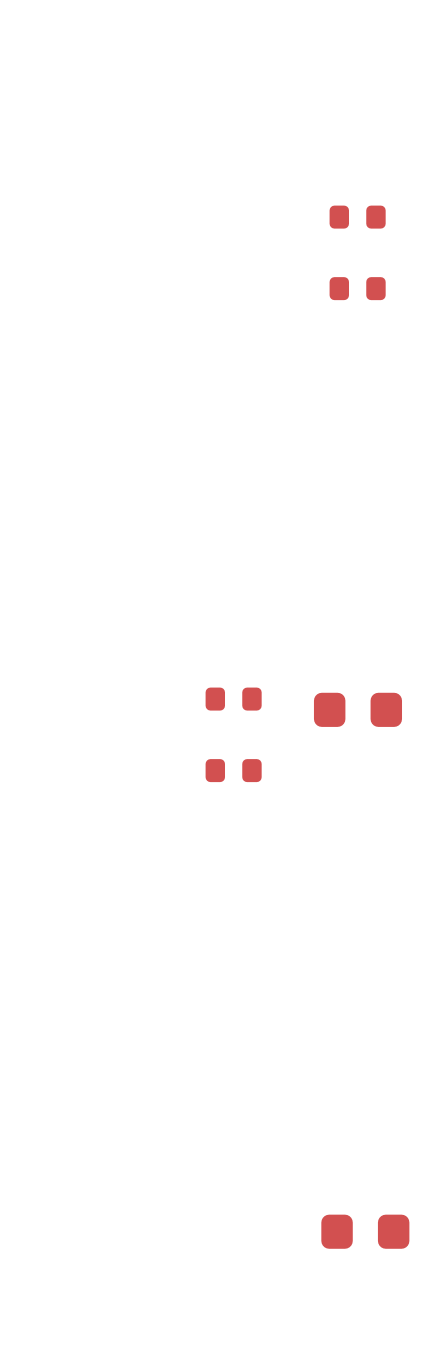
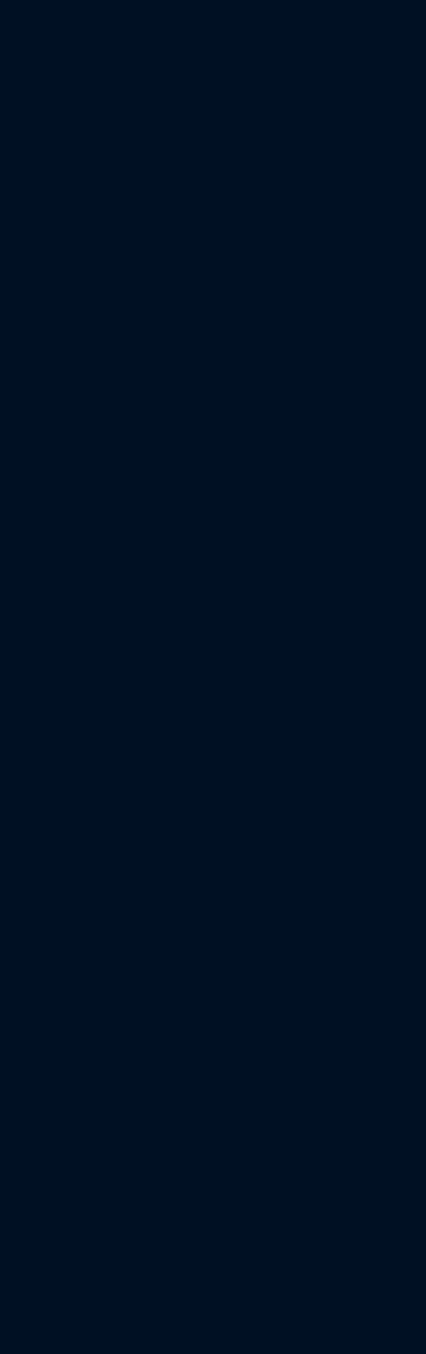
part: (357, 217) -> none
part: (357, 288) -> none
part: (233, 699) -> none
part: (357, 709) -> none
part: (233, 770) -> none
part: (365, 1231) -> none

